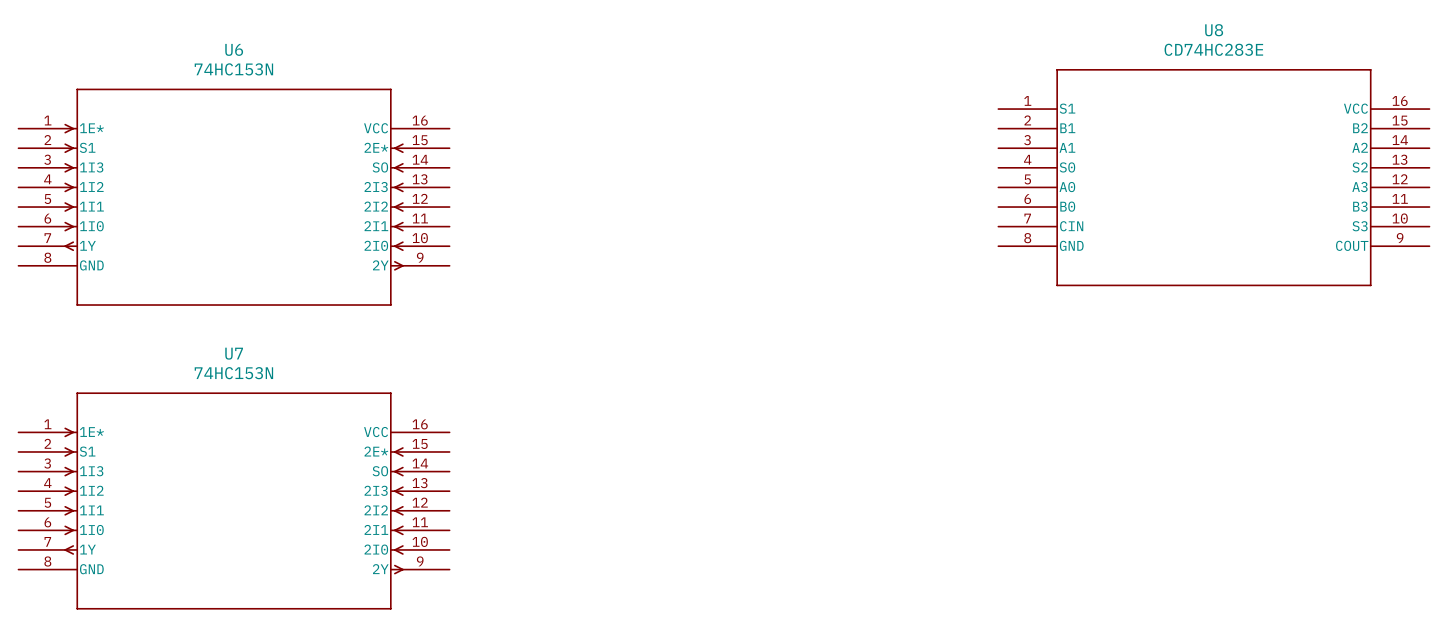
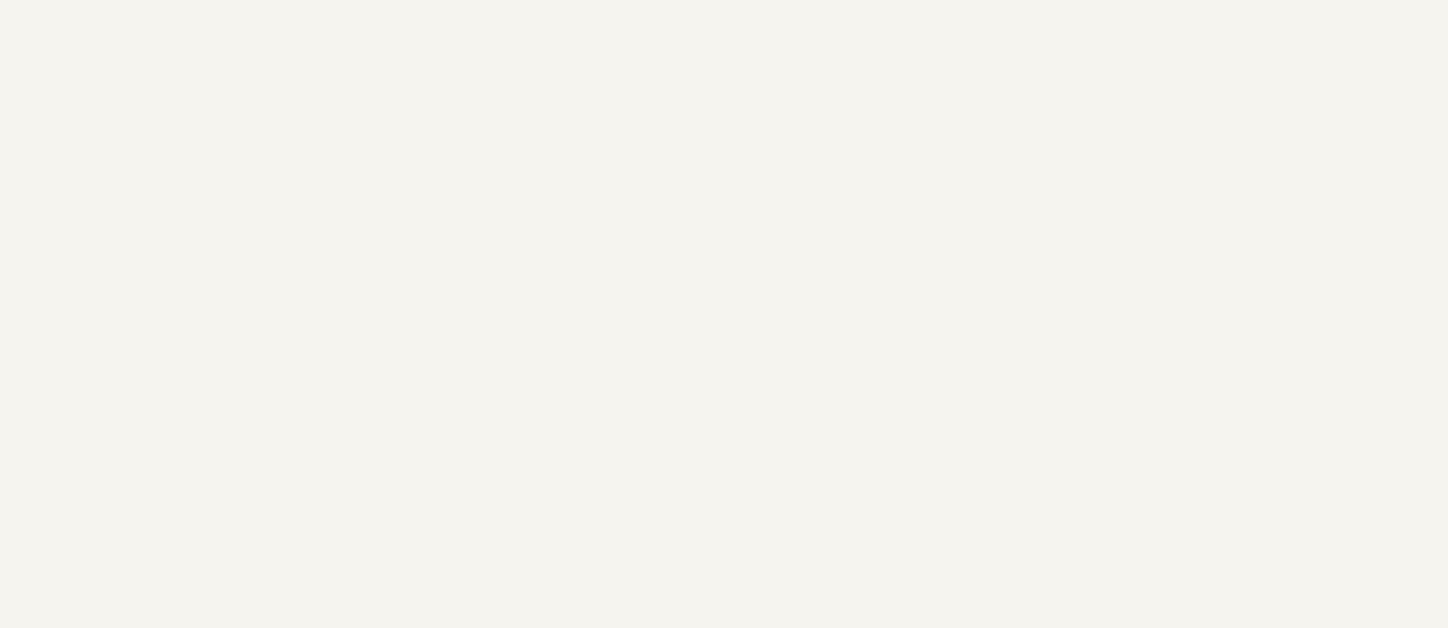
U8: CD74HC283E (1213, 177) -> none
U6: 74HC153N (234, 197) -> none
U7: 74HC153N (234, 500) -> none

